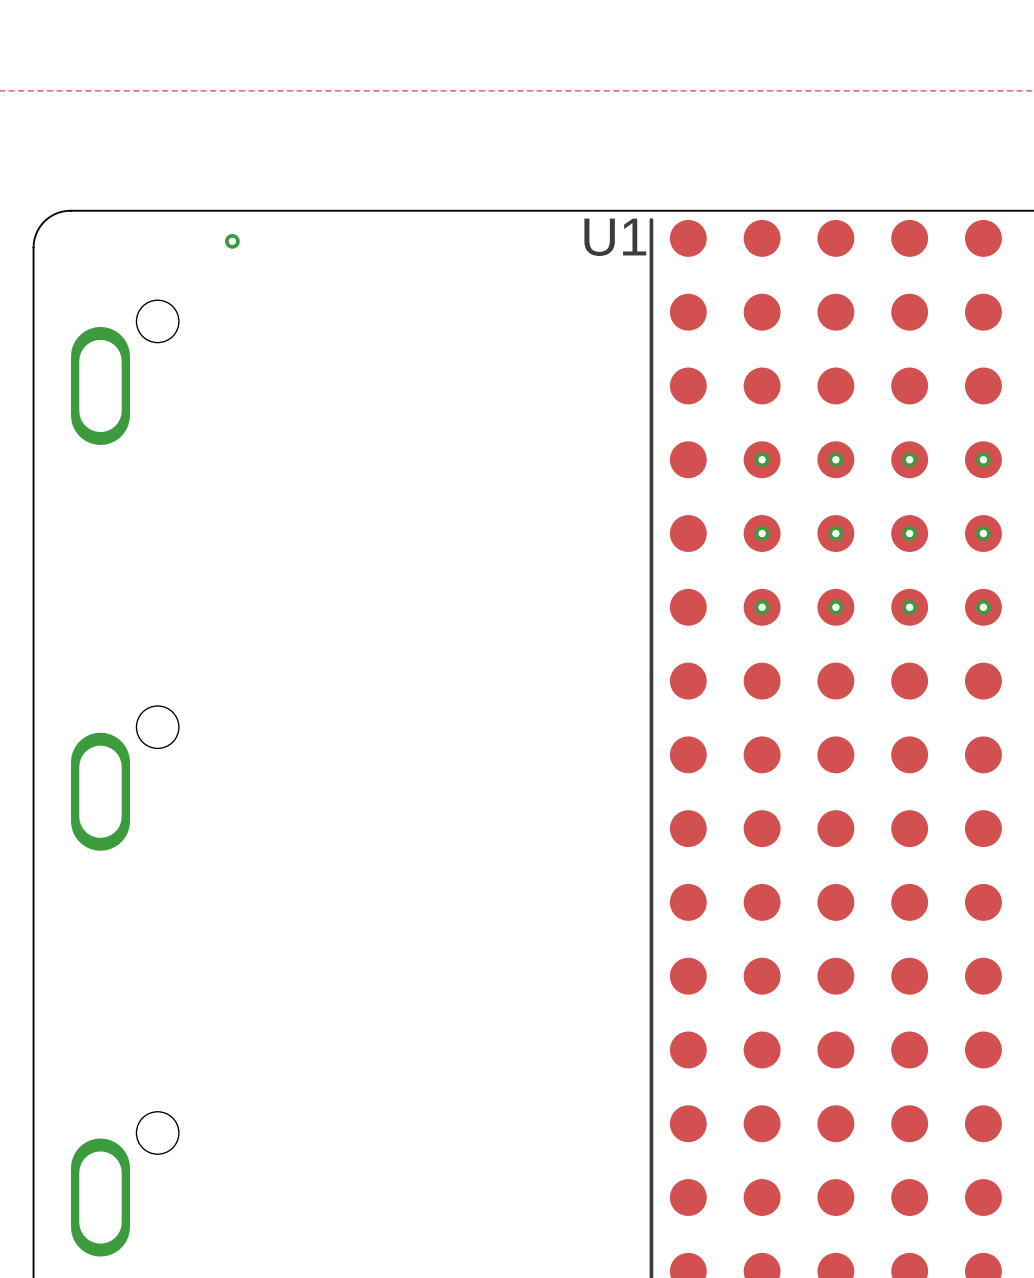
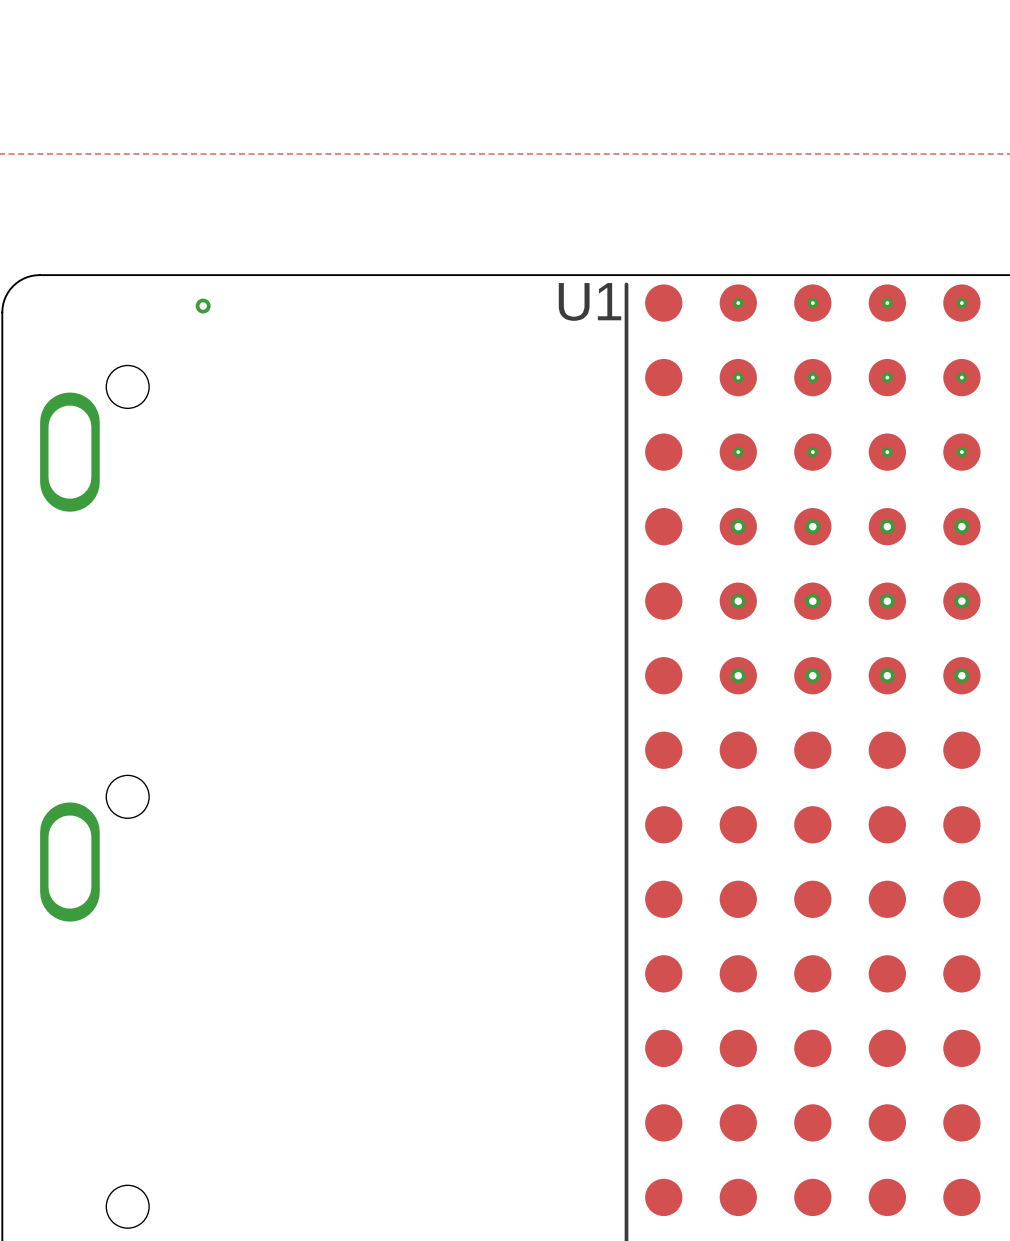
via: none -> (738, 303)
via: none -> (812, 303)
via: none -> (887, 303)
via: none -> (961, 303)
via: none -> (738, 377)
via: none -> (812, 377)
via: none -> (887, 377)
via: none -> (961, 377)
via: none -> (738, 452)
via: none -> (812, 452)
via: none -> (887, 452)
via: none -> (961, 452)

